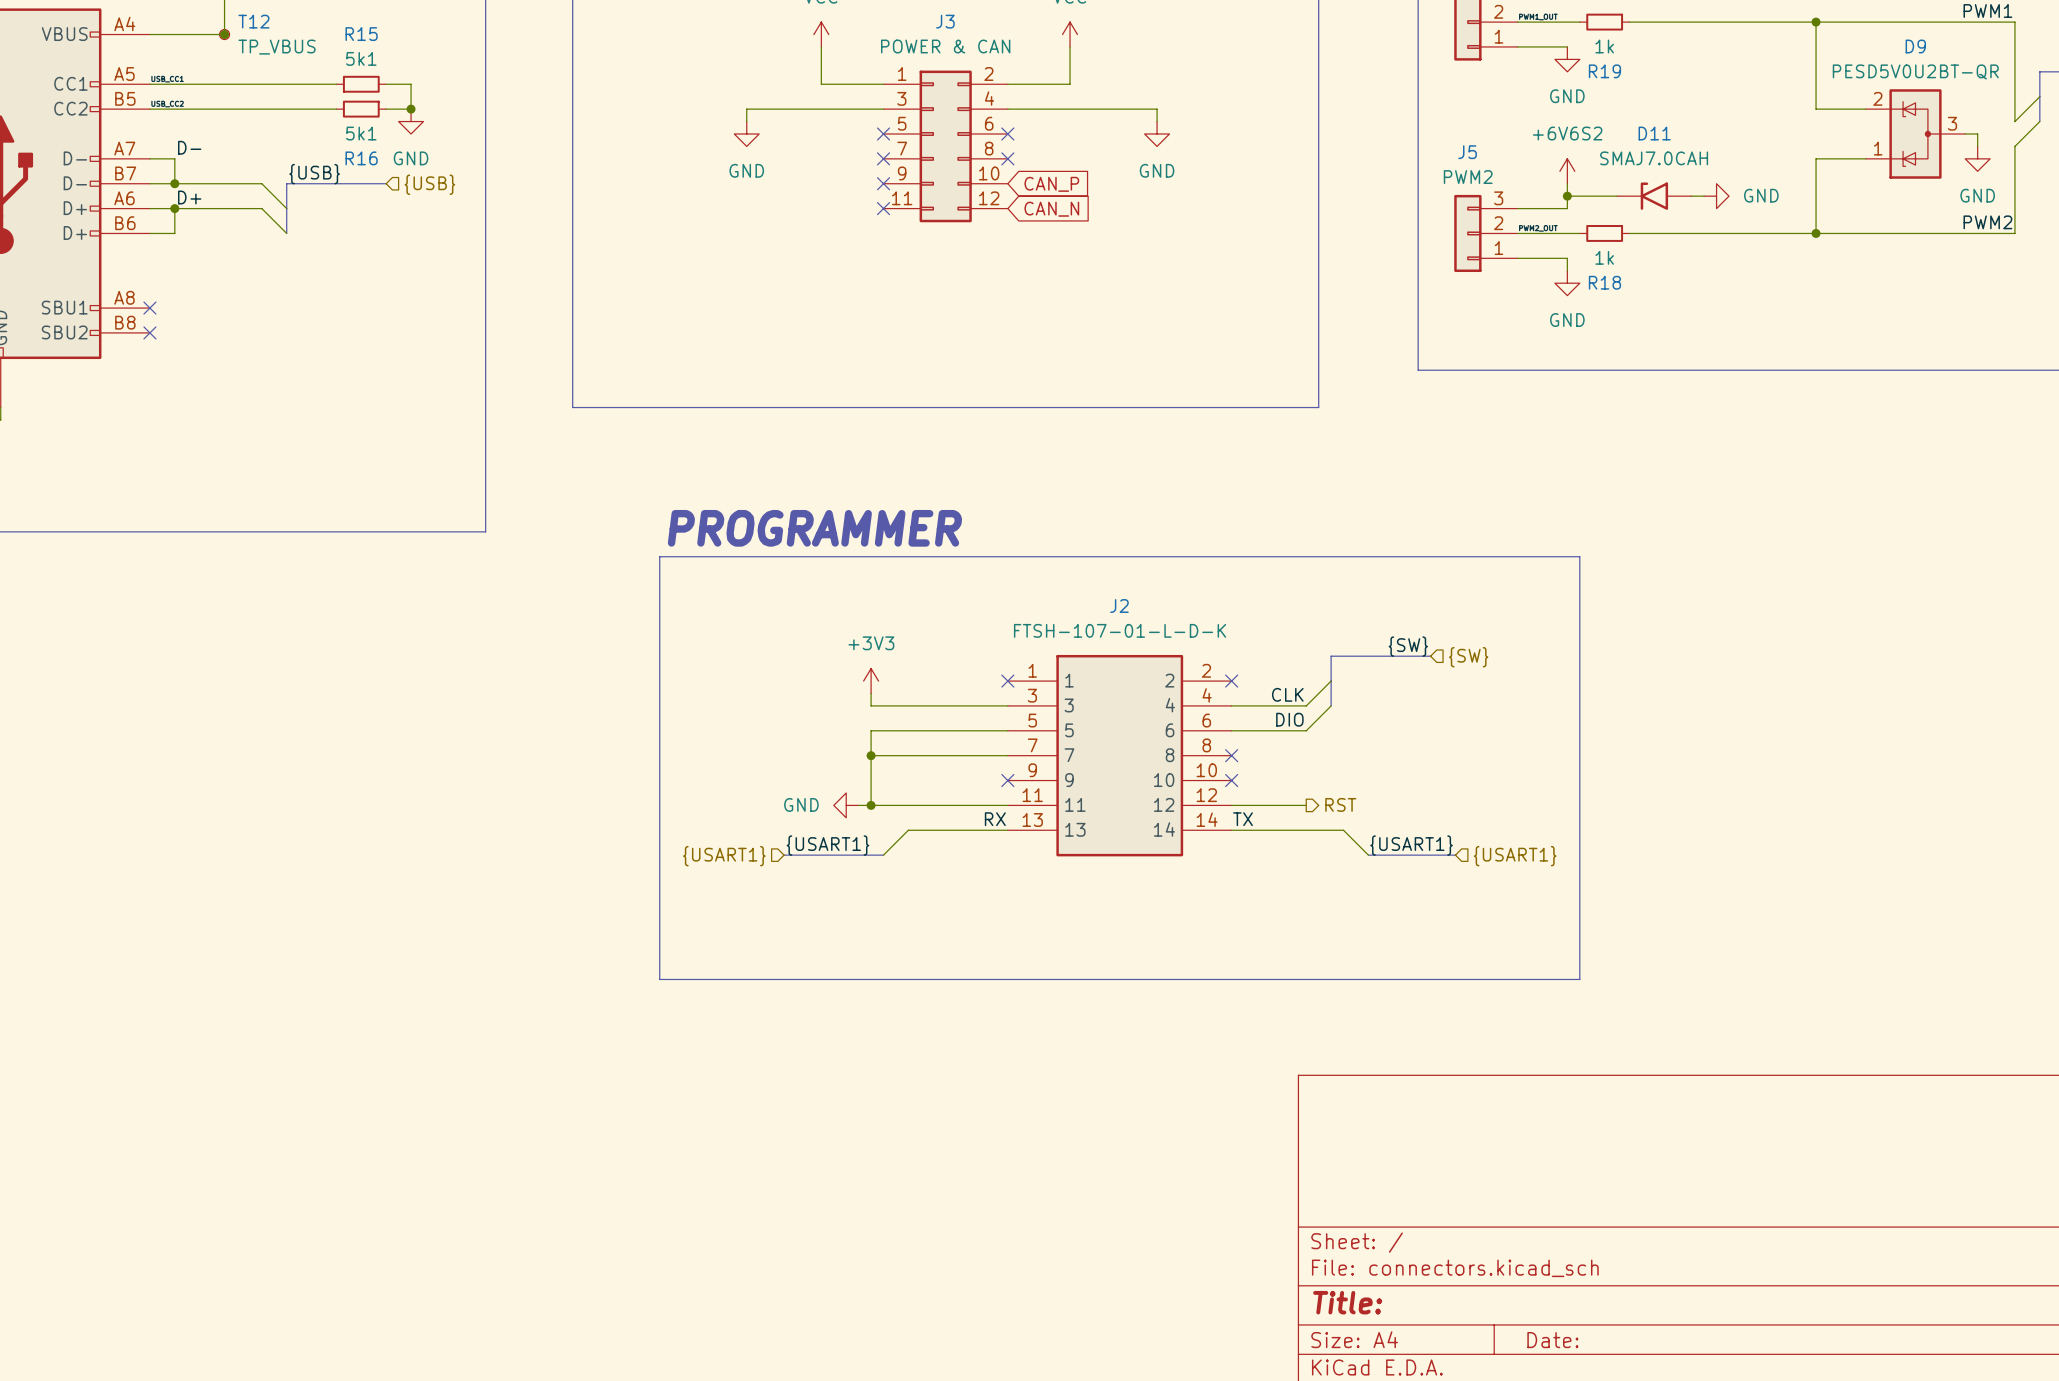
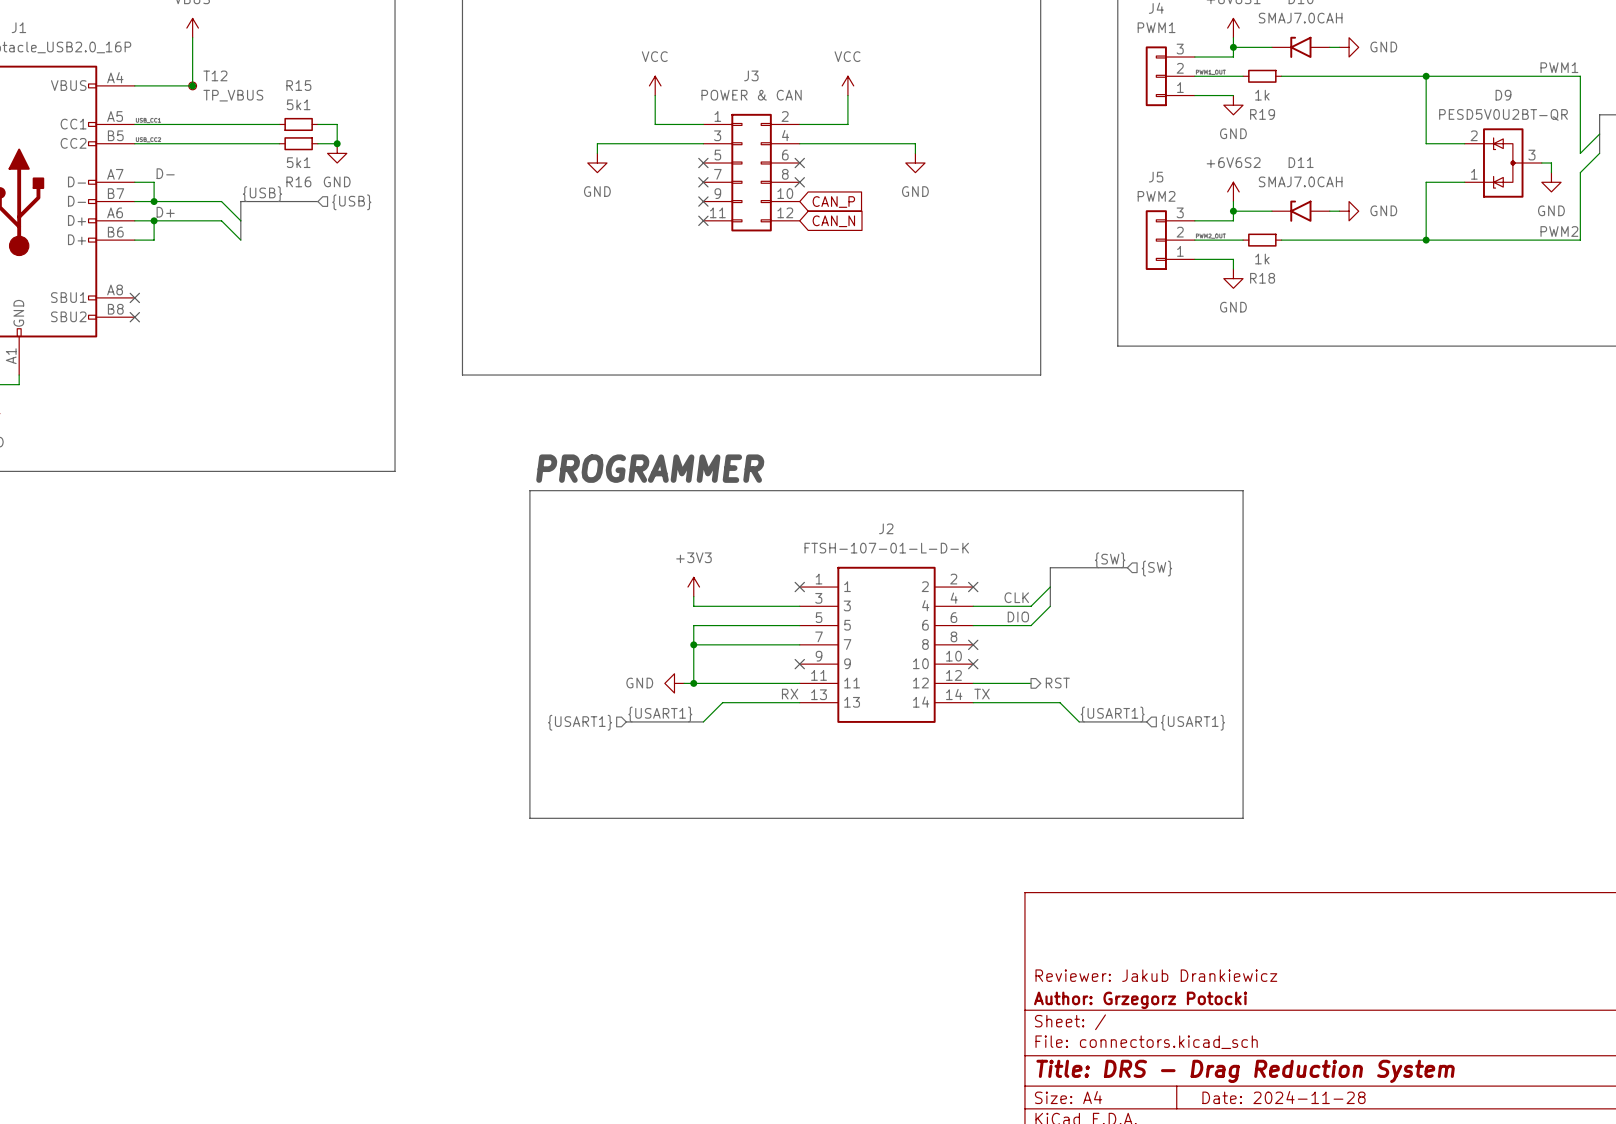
title block: none -> Reviewer: Jakub Drankiewicz (1156, 975)
title block: none -> Author: Grzegorz Potocki (1140, 1000)
title block: Title: (1347, 1302) -> Title: DRS - Drag Reduction System (1245, 1071)
title block: Date: (1552, 1340) -> Date: 2024-11-28 (1284, 1097)

